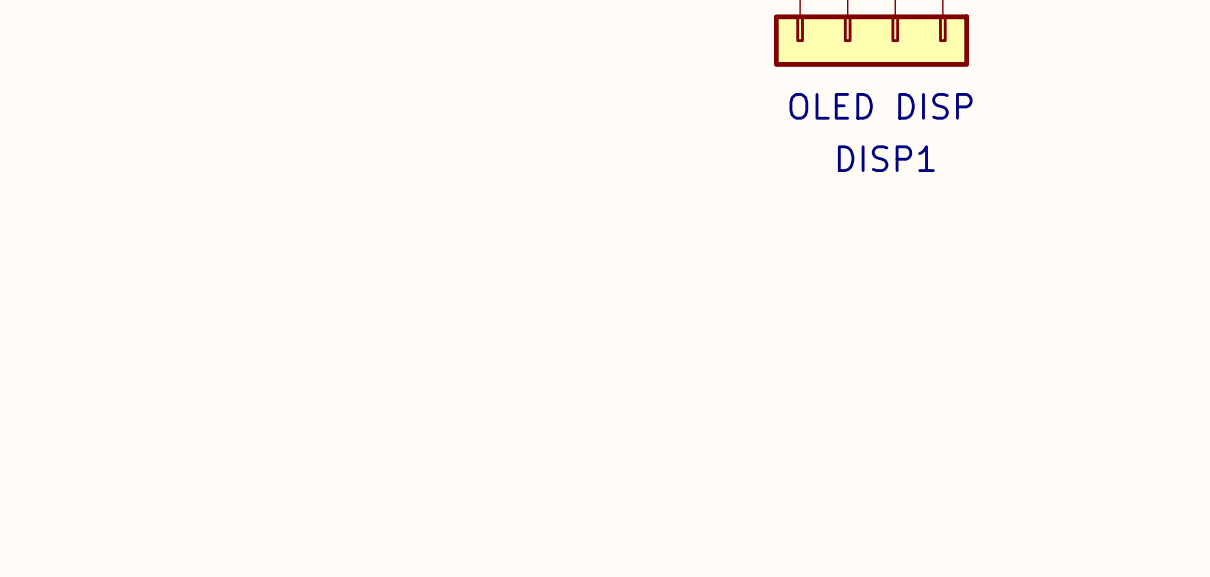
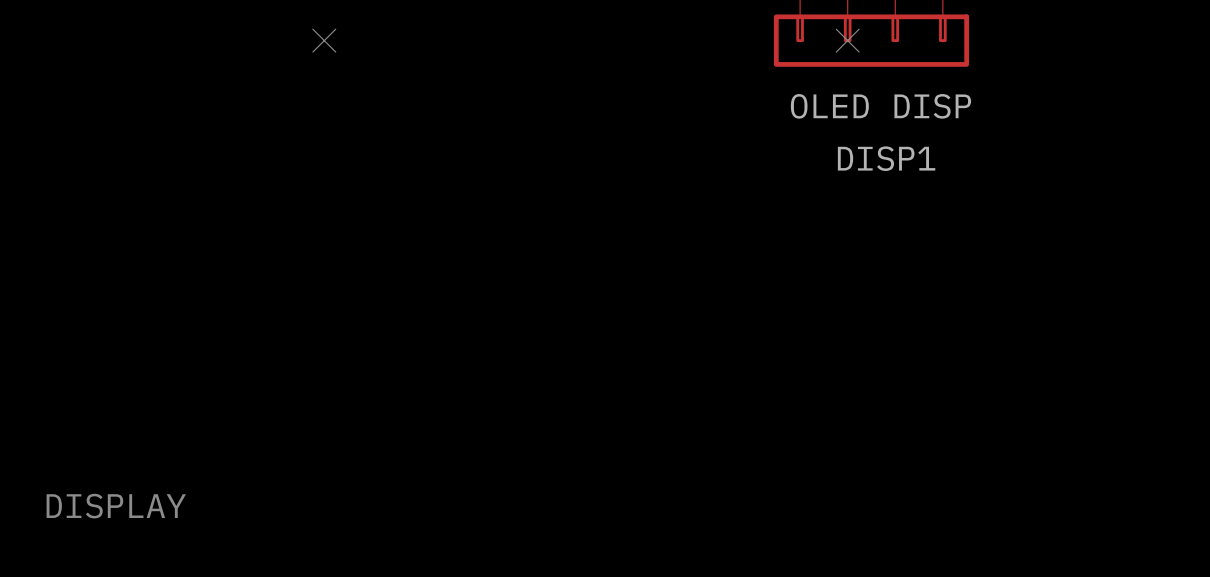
no-connect mark: none -> (324, 40)
no-connect mark: none -> (847, 40)
text: none -> DISPLAY (116, 506)

